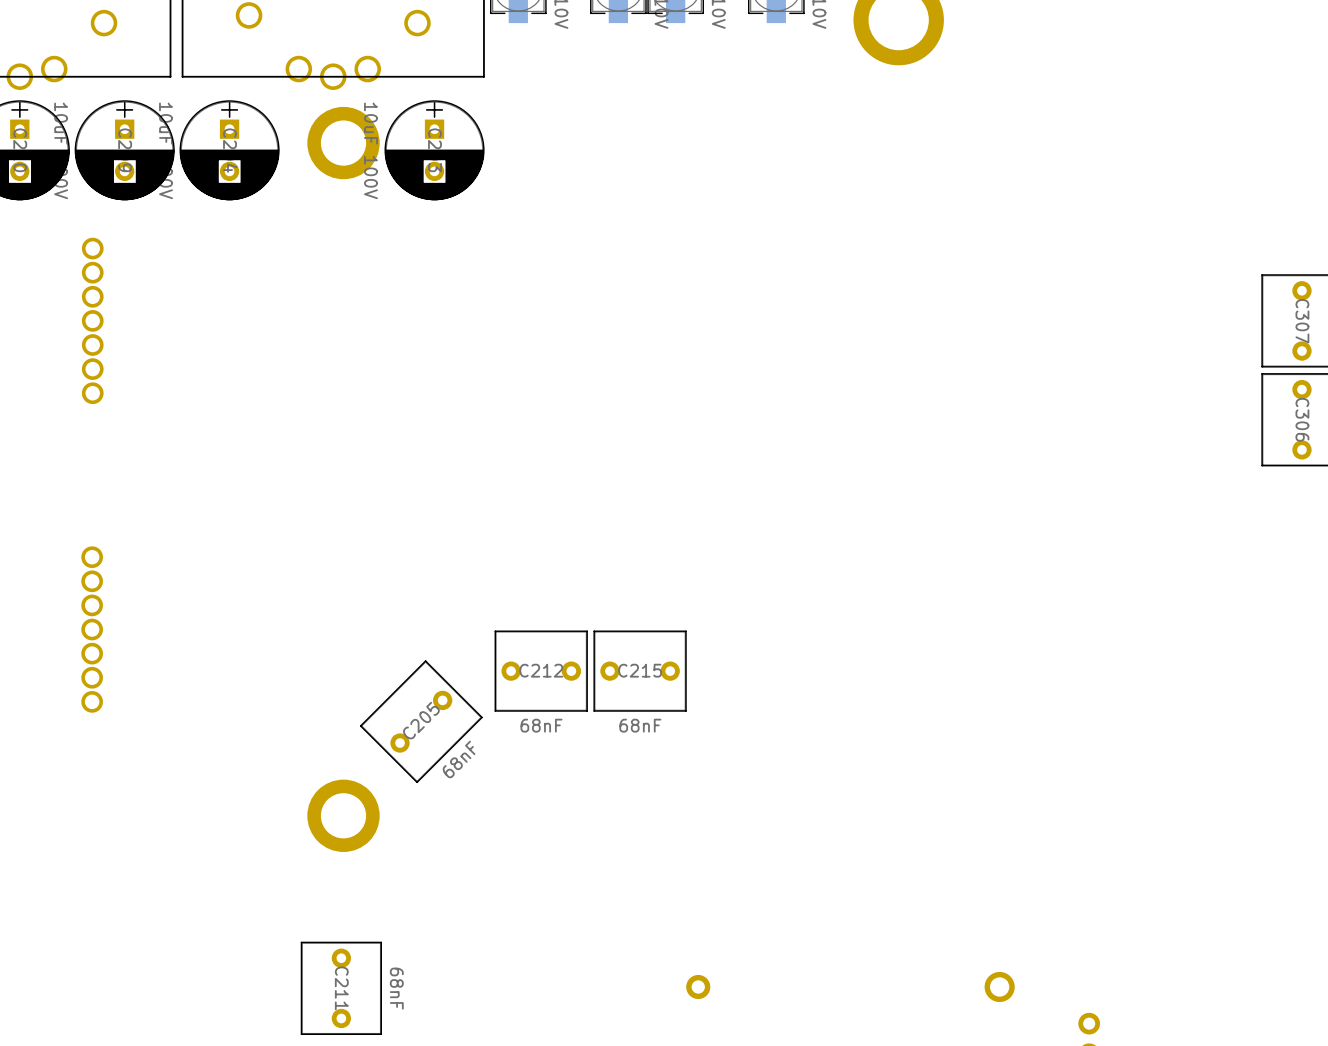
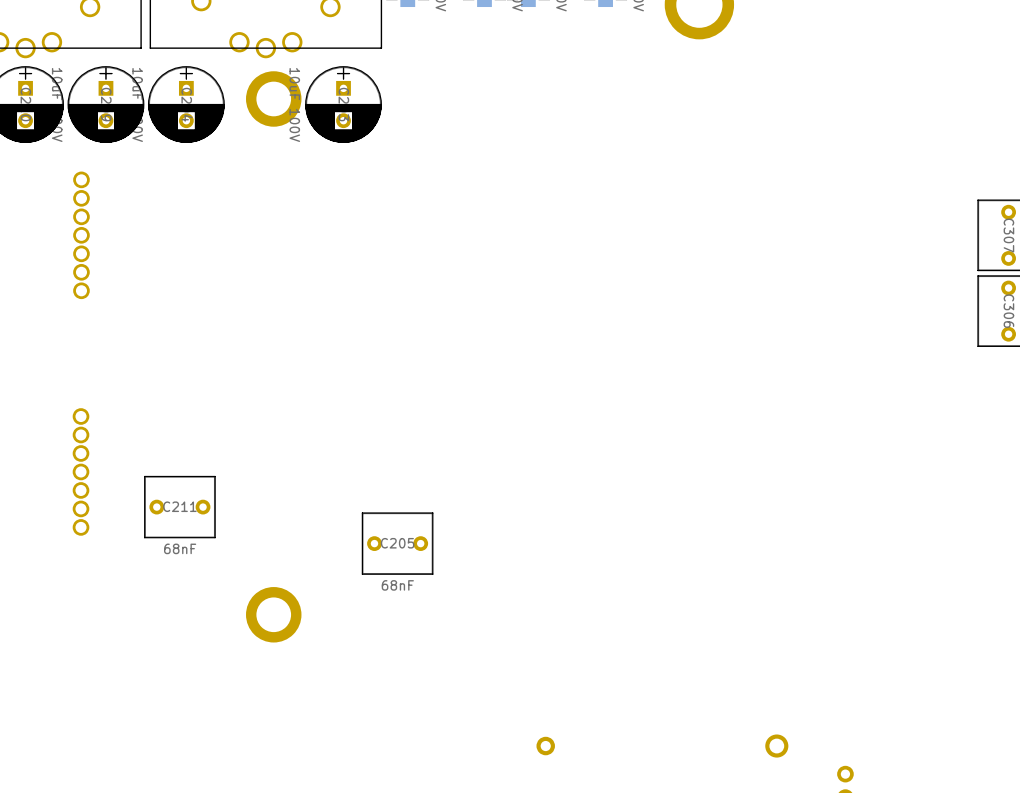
C212: 68nF (541, 671) -> none
C215: 68nF (640, 671) -> none
C205 rotation: 0° (421, 721) -> 45° clockwise (397, 543)
C205 position: (421, 721) -> (397, 543)
C211 rotation: 0° (341, 988) -> 90° clockwise (179, 507)
C211 position: (341, 988) -> (179, 507)

